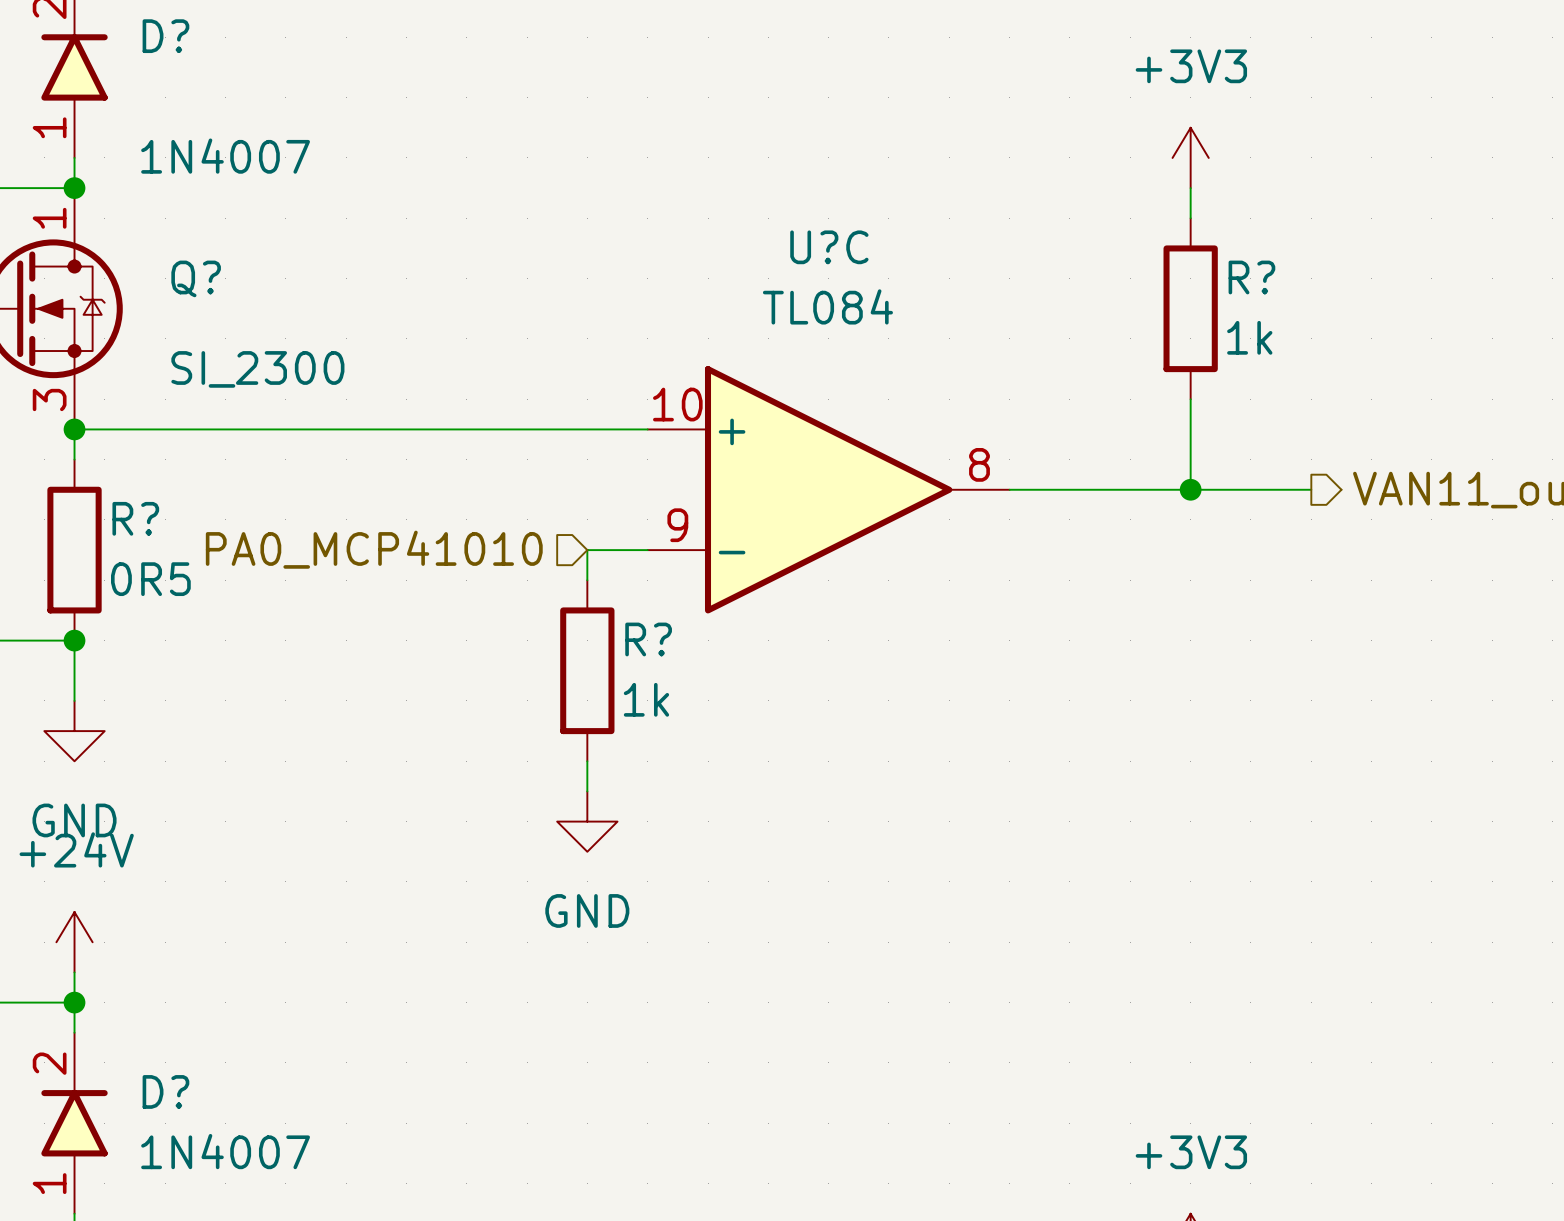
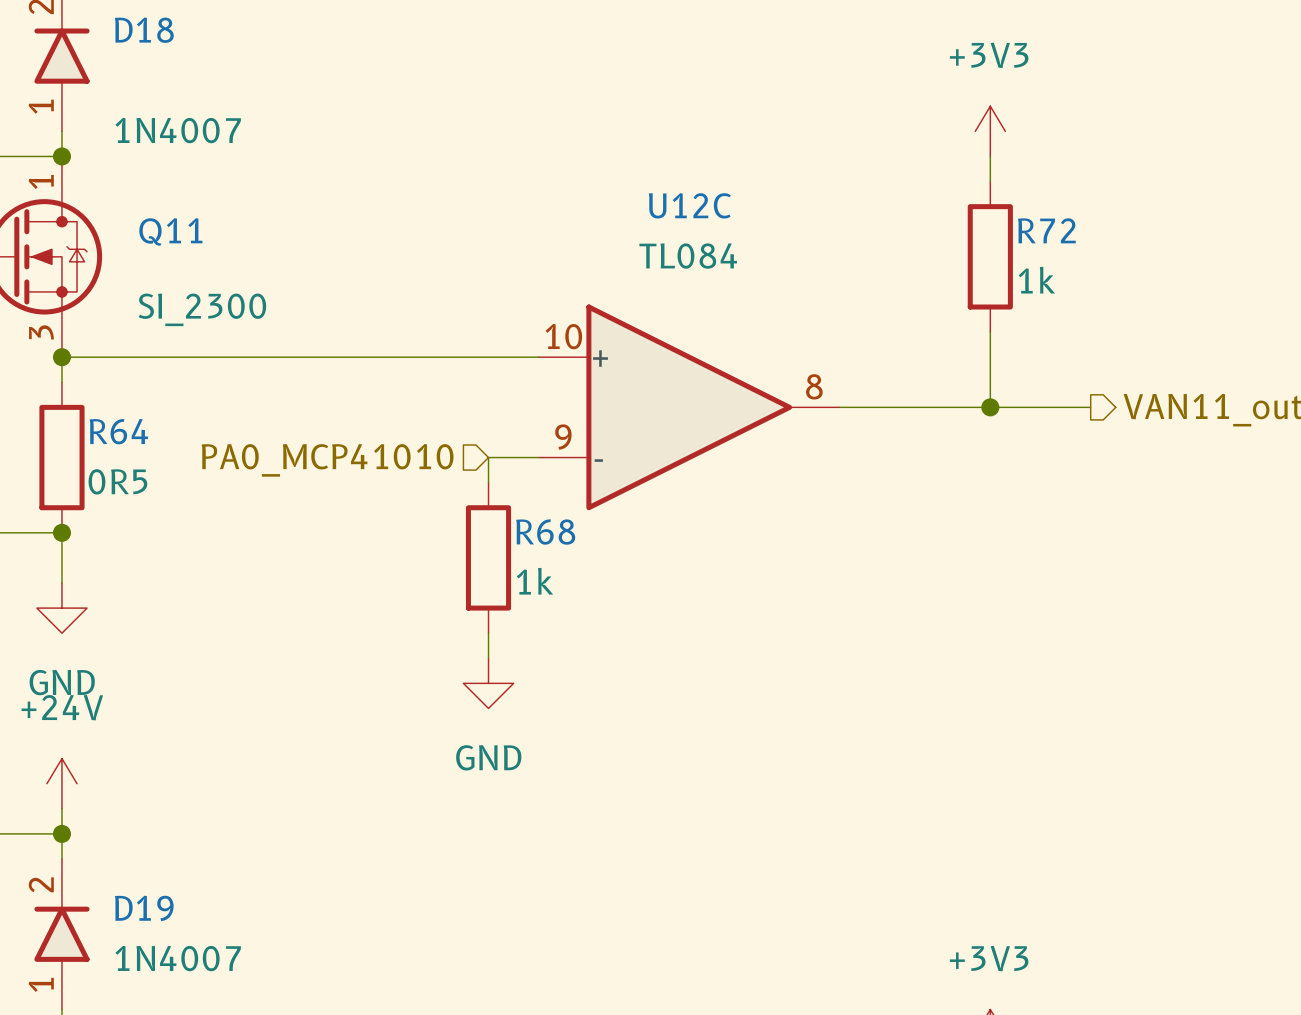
D? name: D? (165, 36) -> D18 (144, 30)
U?C name: U?C (829, 247) -> U12C (689, 205)
R? name: R? (1251, 277) -> R72 (1046, 230)
Q? name: Q? (196, 278) -> Q11 (170, 231)
R? name: R? (135, 518) -> R64 (118, 431)
R? name: R? (648, 639) -> R68 (545, 532)
D? name: D? (165, 1091) -> D19 (144, 908)

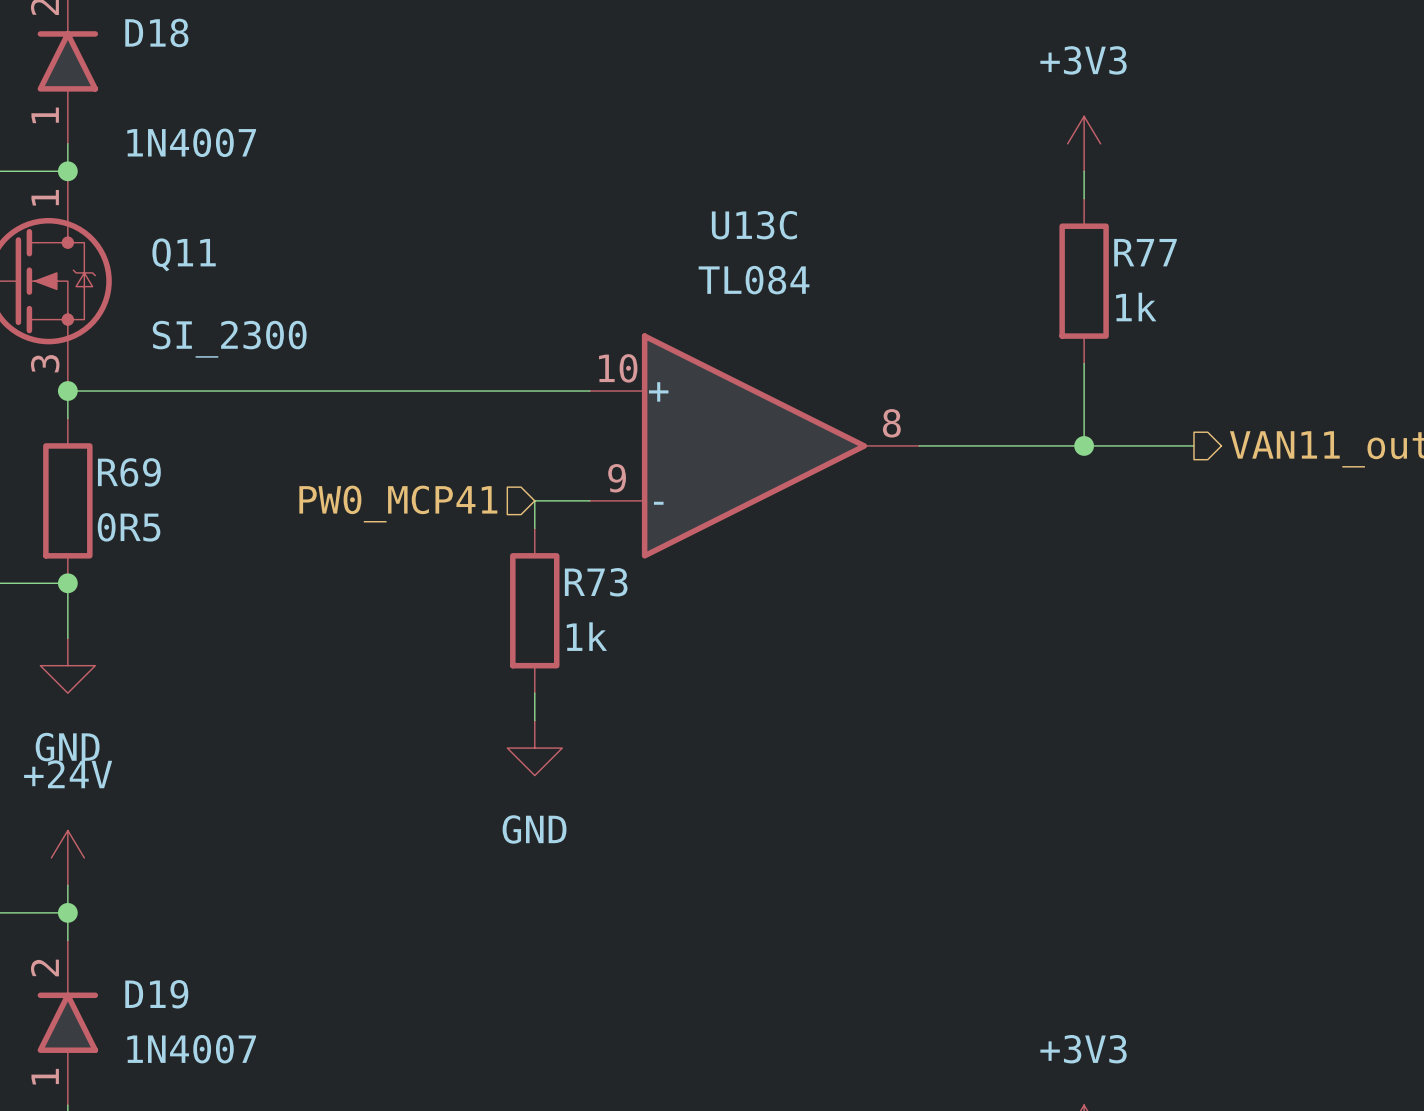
U12C name: U12C (689, 205) -> U13C (754, 225)
R72 name: R72 (1046, 230) -> R77 (1145, 252)
R64 name: R64 (118, 431) -> R69 (129, 472)
hierarchical label: PA0_MCP41010 (327, 460) -> PW0_MCP41 (398, 504)
R68 name: R68 (545, 532) -> R73 (596, 582)

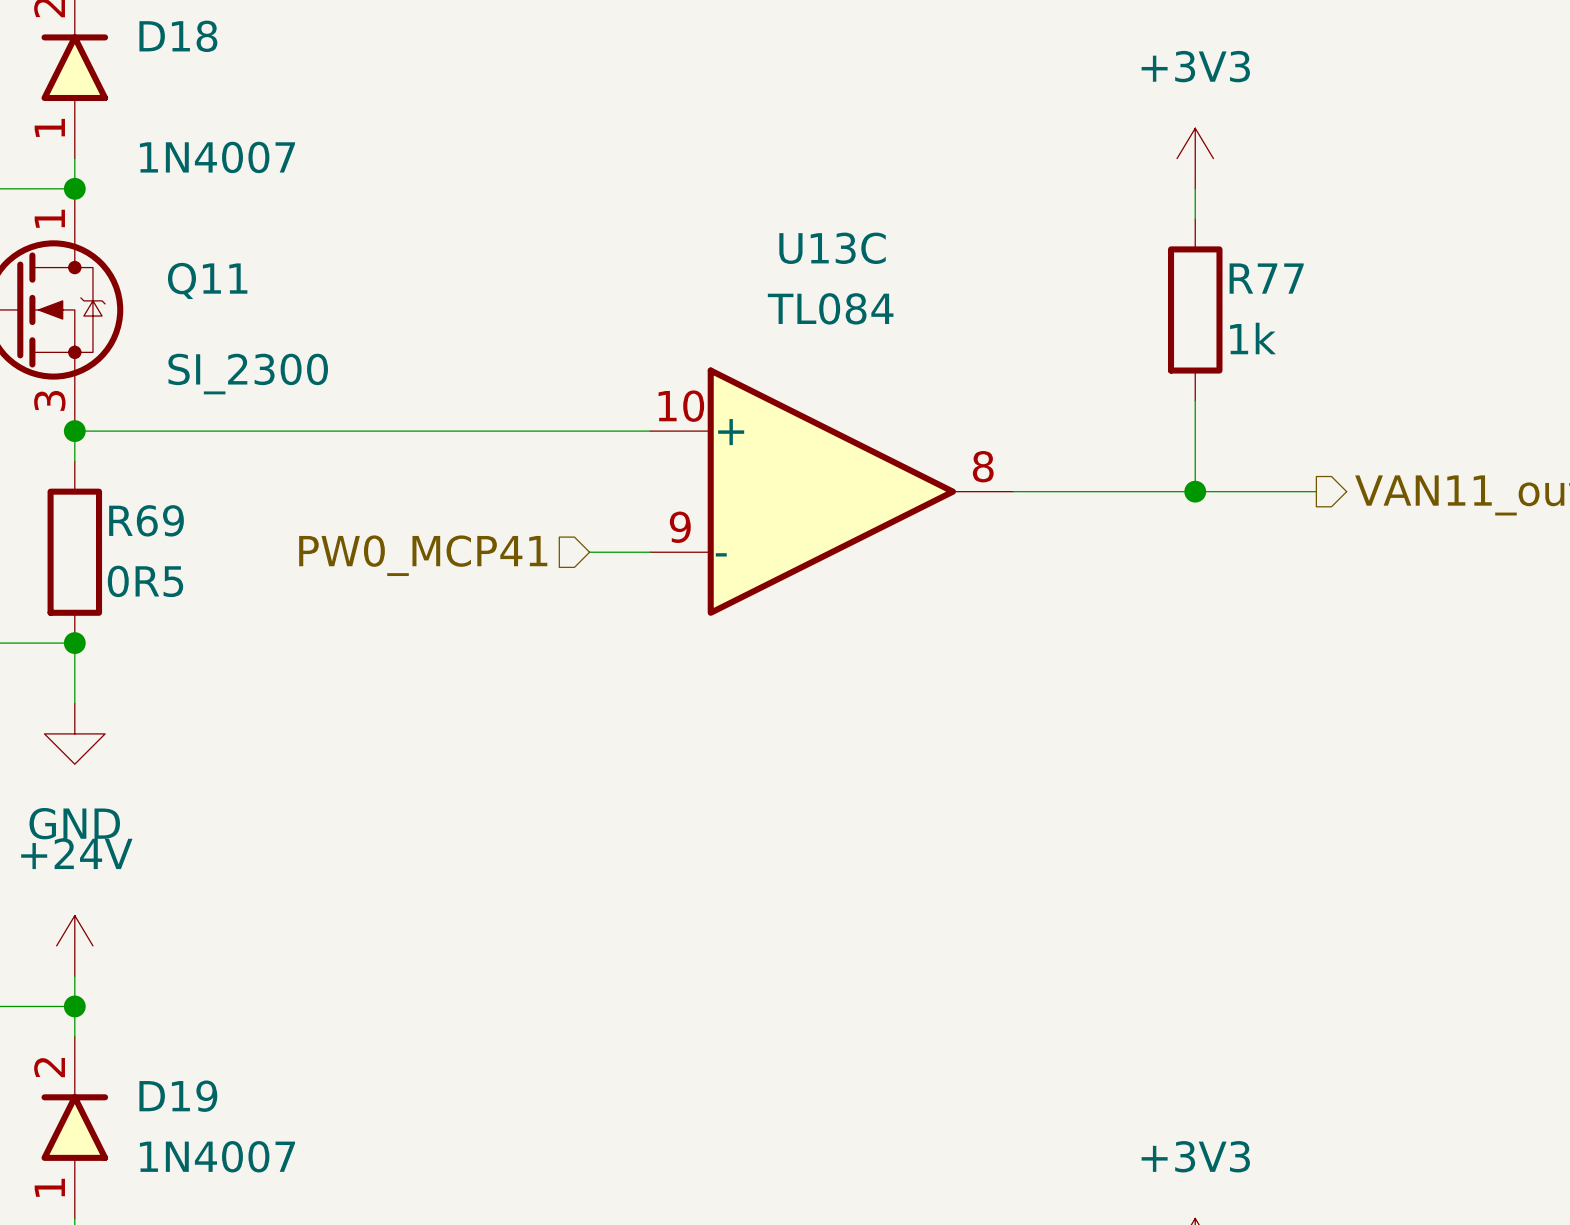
wire: (534, 500) (534, 528) -> none
R73: 1k (534, 610) -> none
wire: (534, 693) (534, 720) -> none
power symbol: GND (534, 748) -> none

